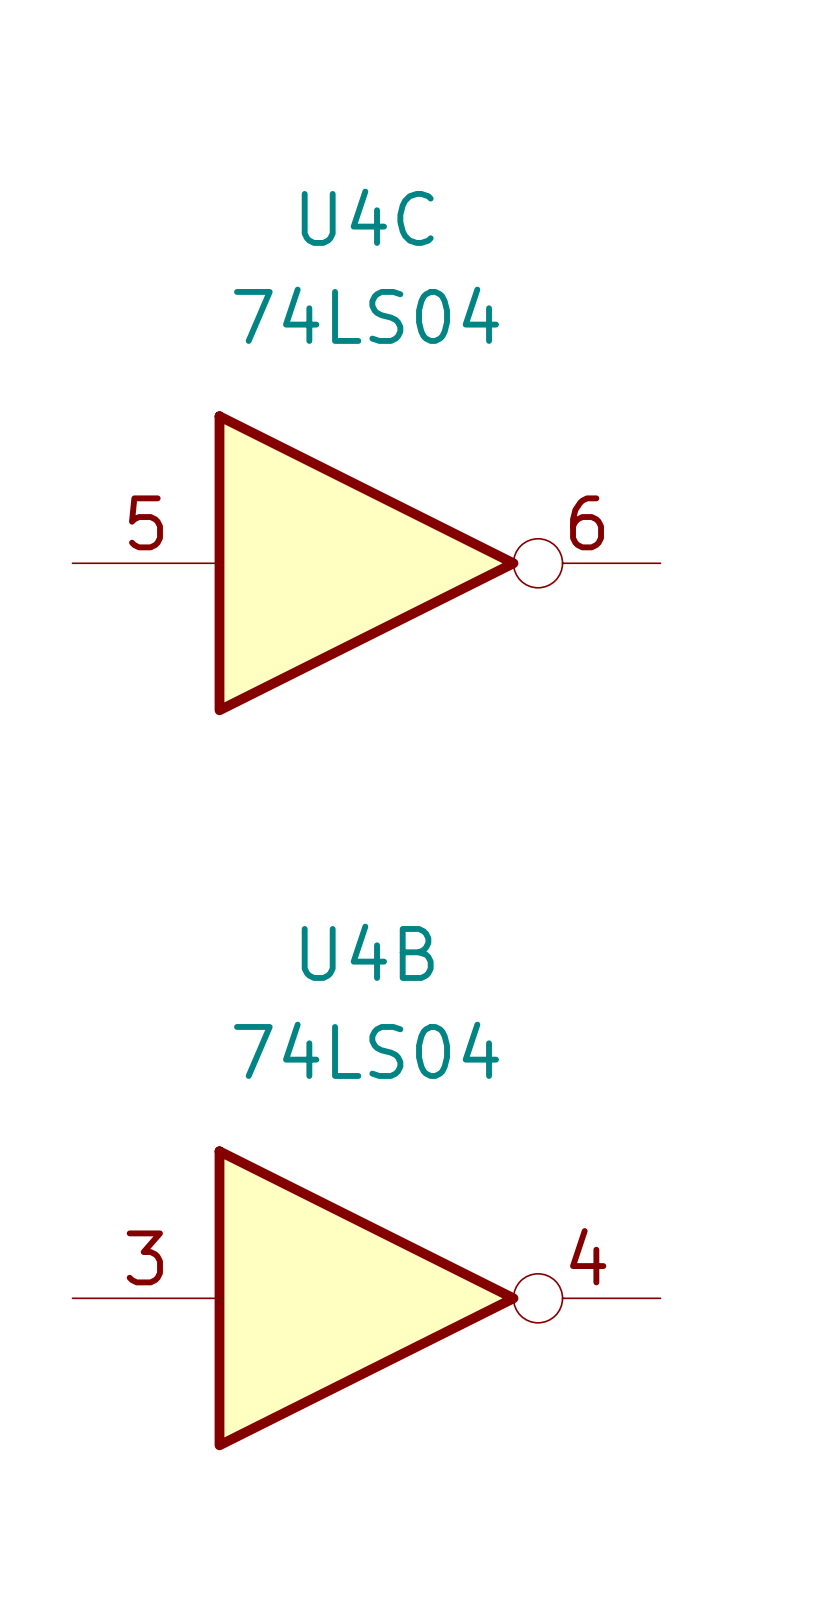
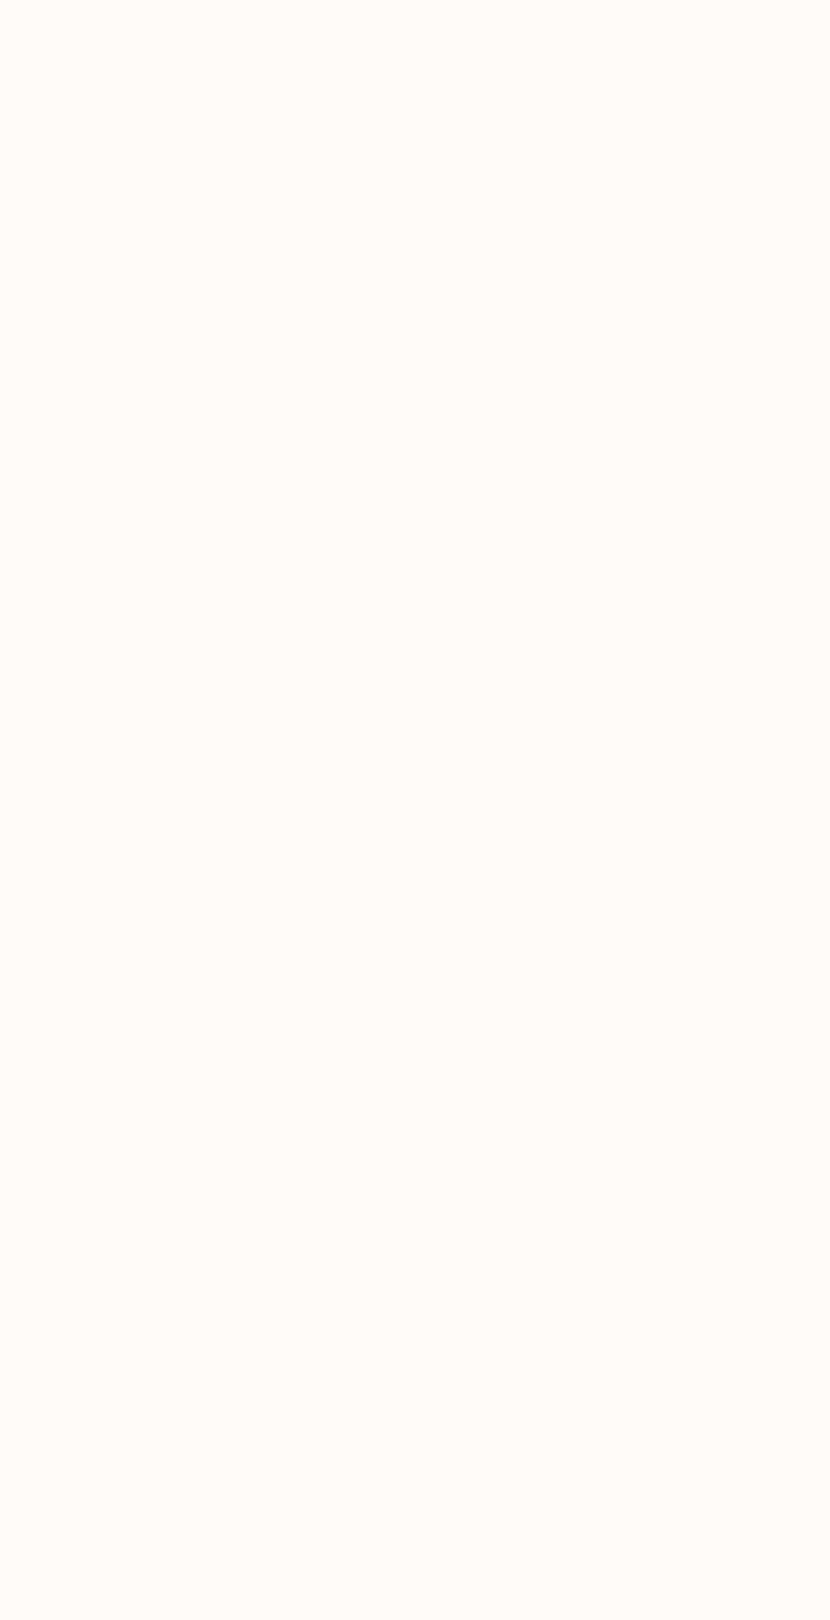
U4C: 74LS04 (366, 563) -> none
U4B: 74LS04 (366, 1298) -> none

